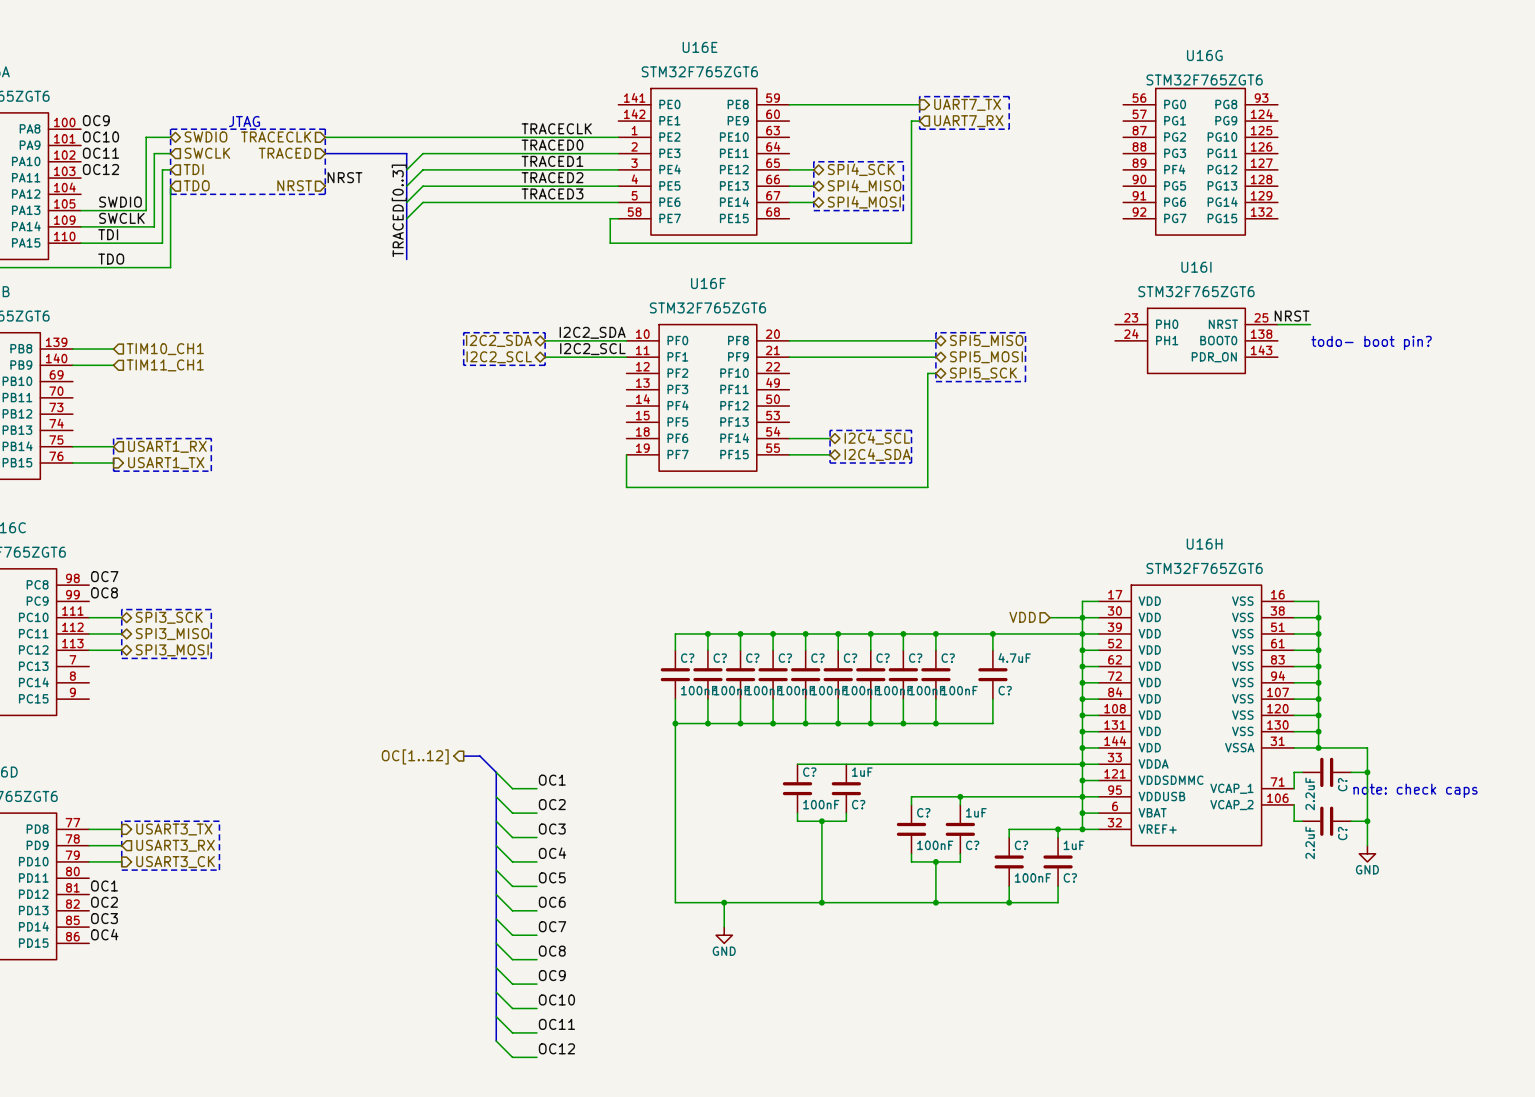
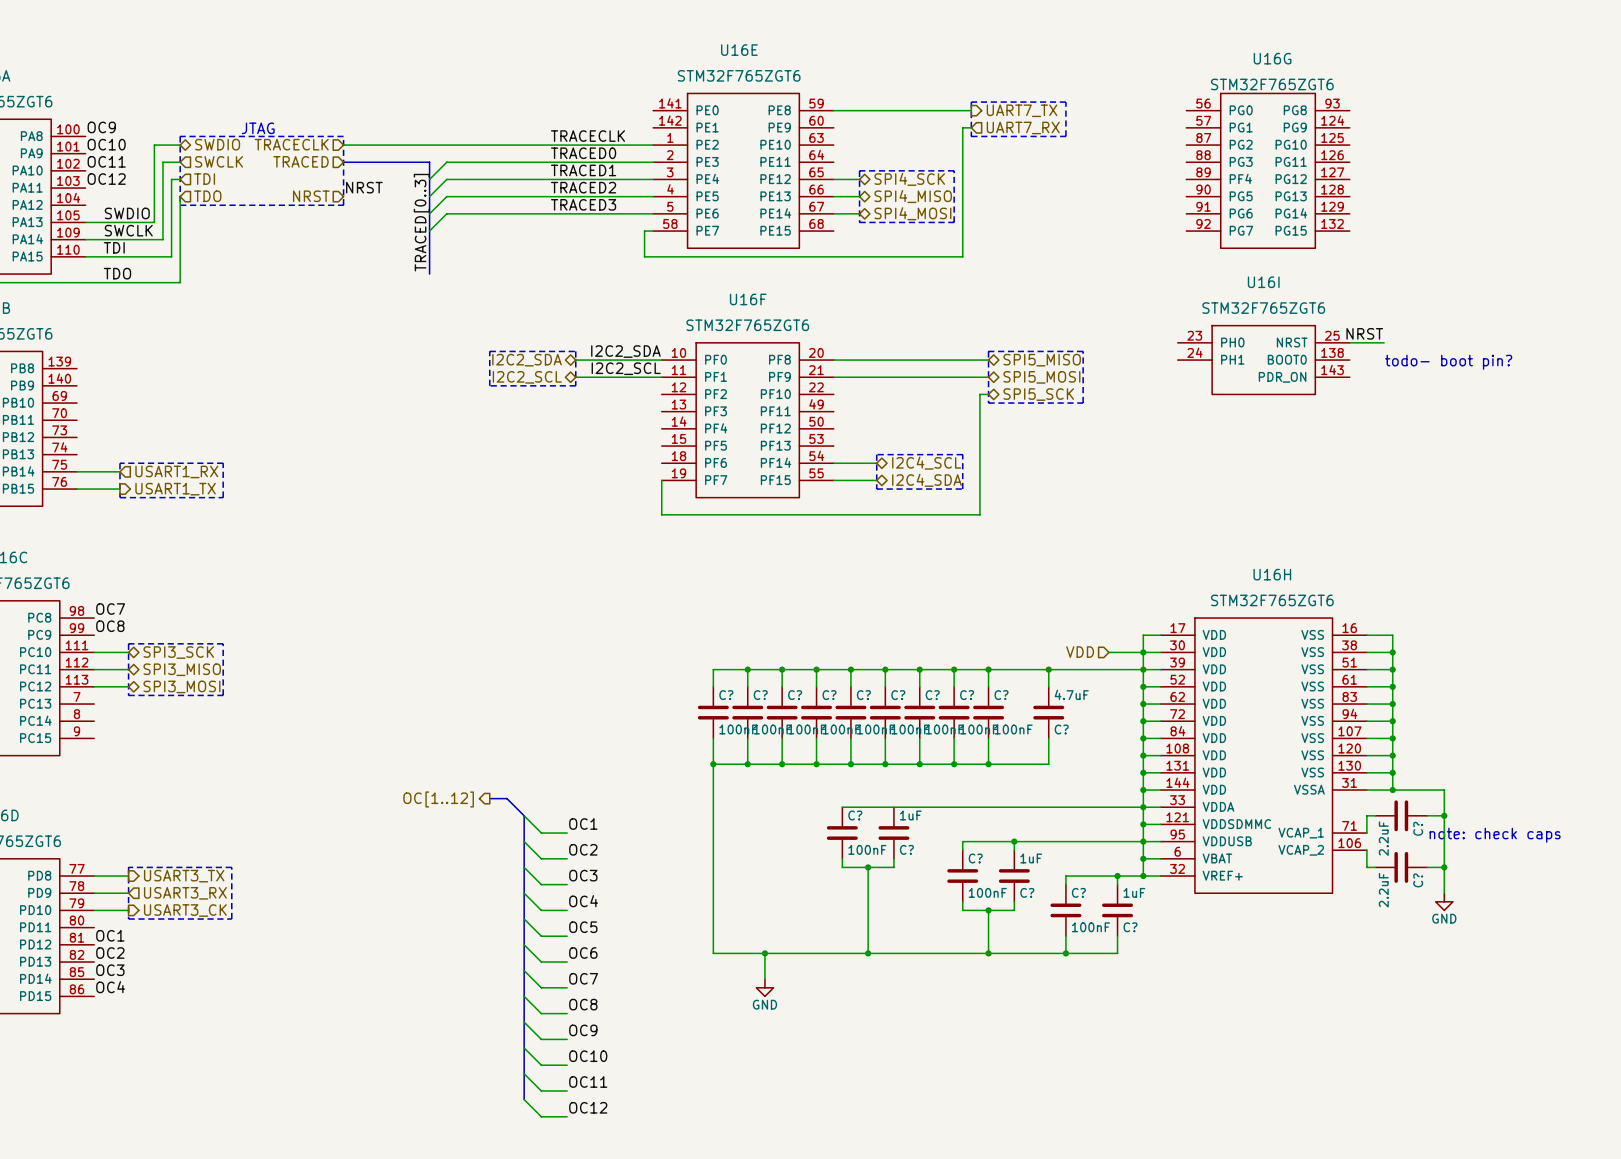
wire: (72, 349) (113, 349) -> none
hierarchical label: TIM10_CH1 (165, 349) -> none
wire: (72, 365) (113, 365) -> none
hierarchical label: TIM11_CH1 (165, 365) -> none

